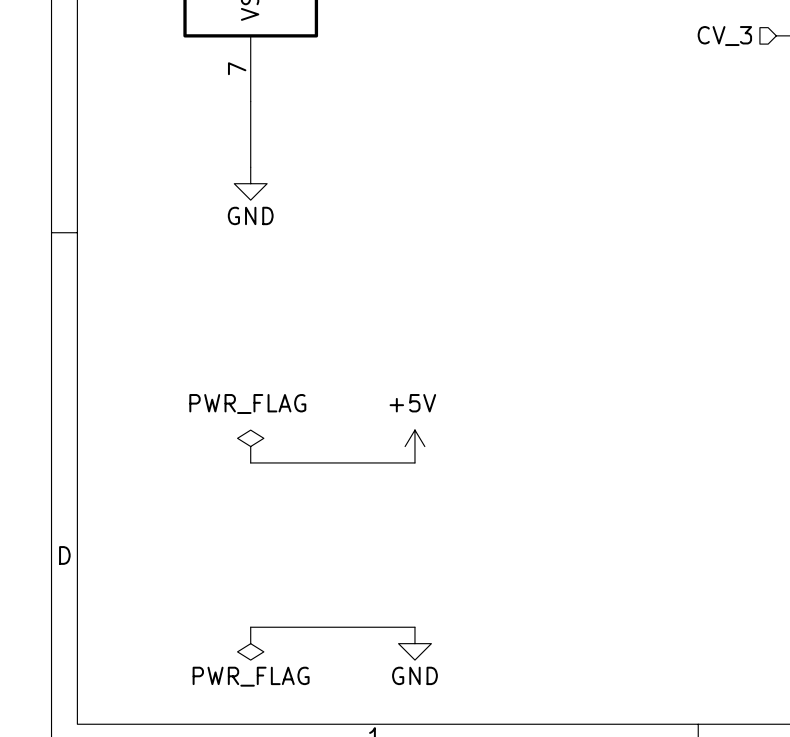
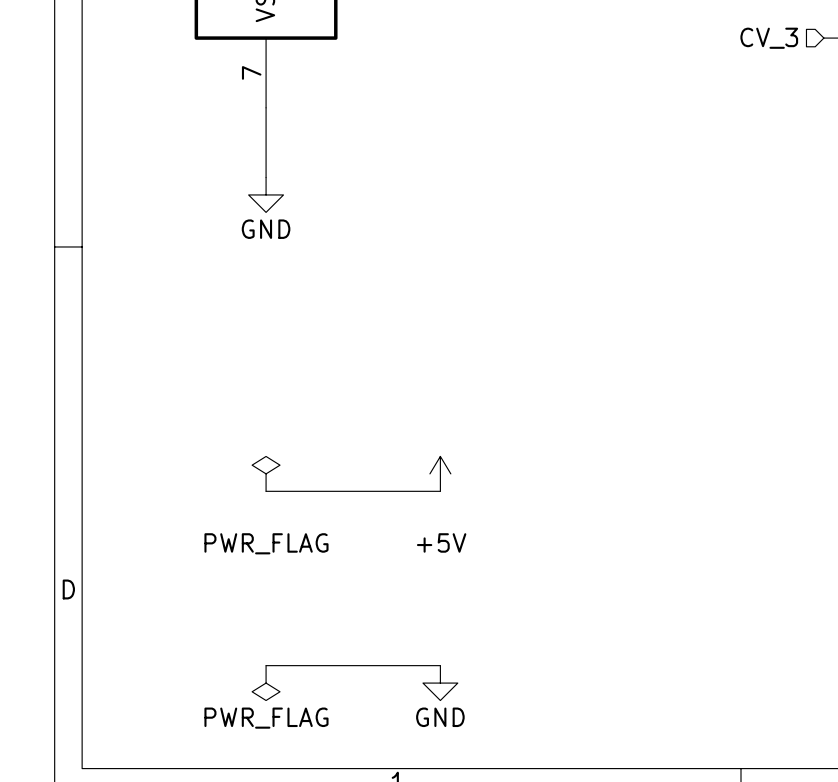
power symbol text position: +5V (412, 403) -> +5V (441, 542)
power symbol text position: PWR_FLAG (247, 404) -> PWR_FLAG (266, 543)

